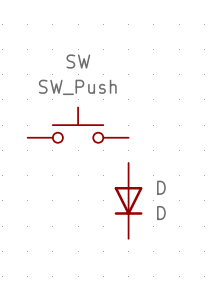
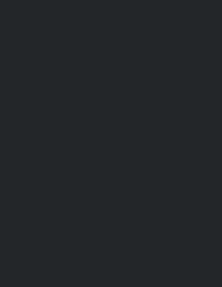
SW: SW_Push (78, 125) -> none
D: D (128, 200) -> none

